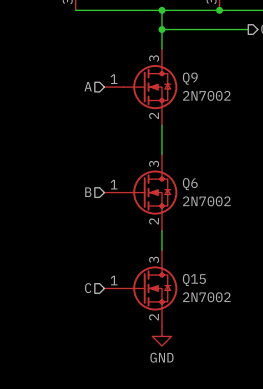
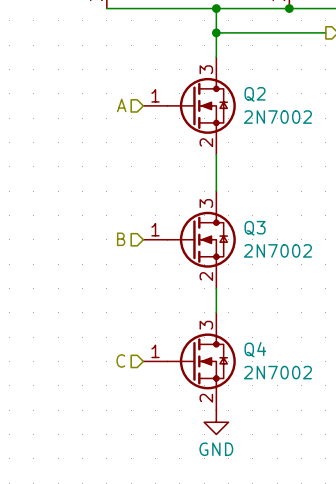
Q9 name: Q9 (190, 78) -> Q2 (255, 94)
Q6 name: Q6 (190, 184) -> Q3 (255, 228)
Q15 name: Q15 (194, 280) -> Q4 (255, 349)

